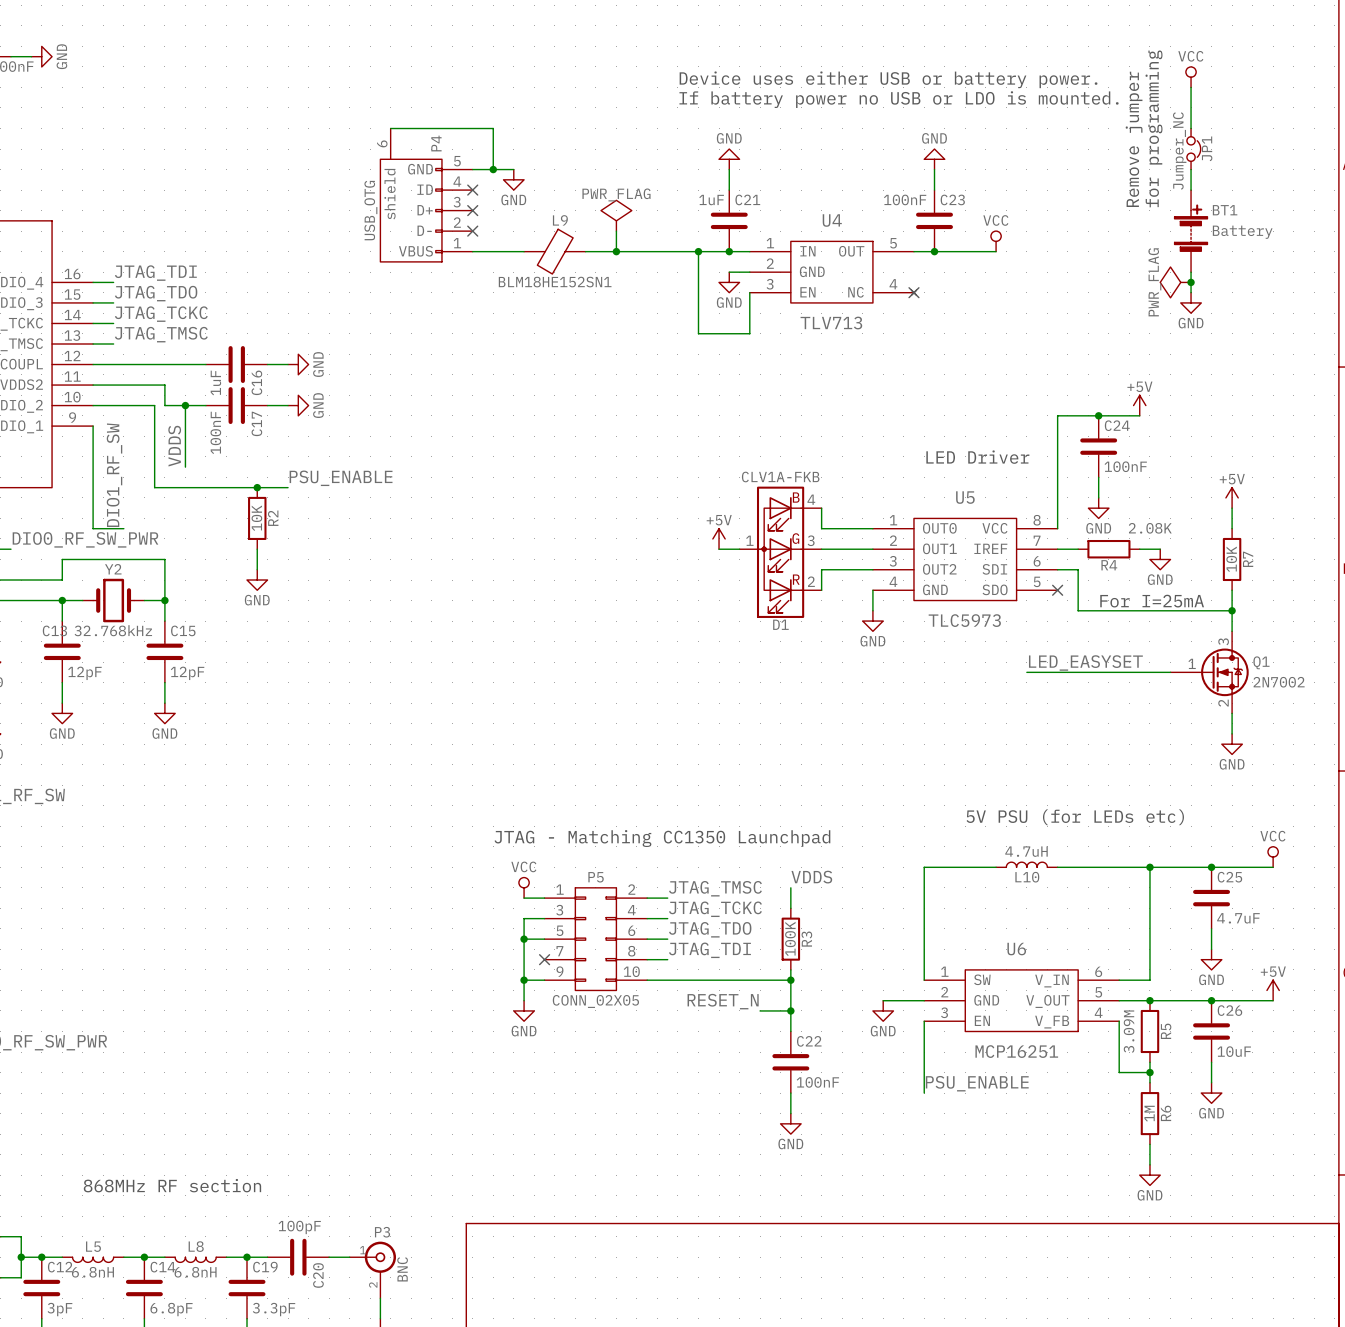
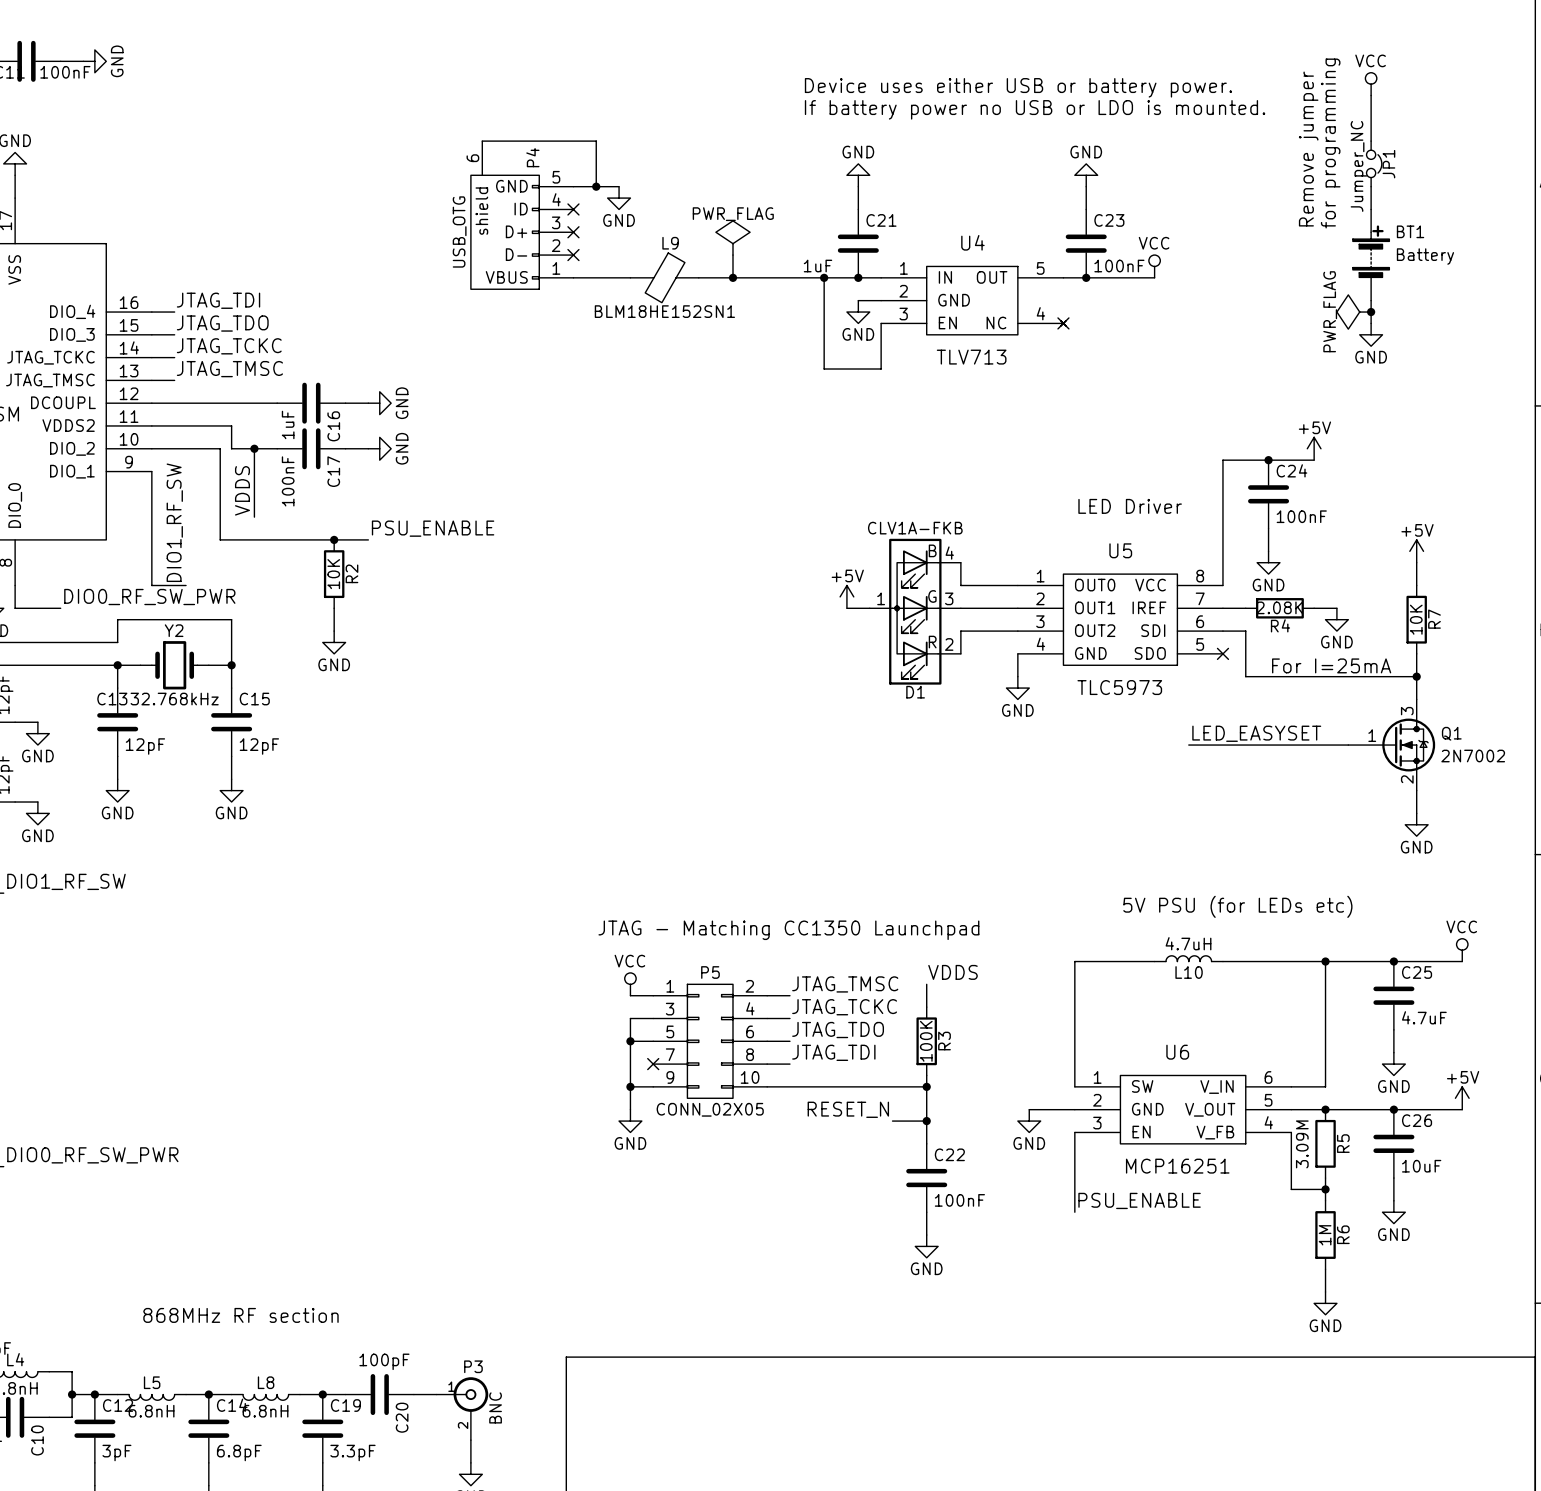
C23 value position: 100nF (905, 199) -> 100nF (1119, 266)
C21 value position: 1uF (711, 200) -> 1uF (818, 266)
R4 value position: 2.08K (1150, 528) -> 2.08K (1279, 607)

